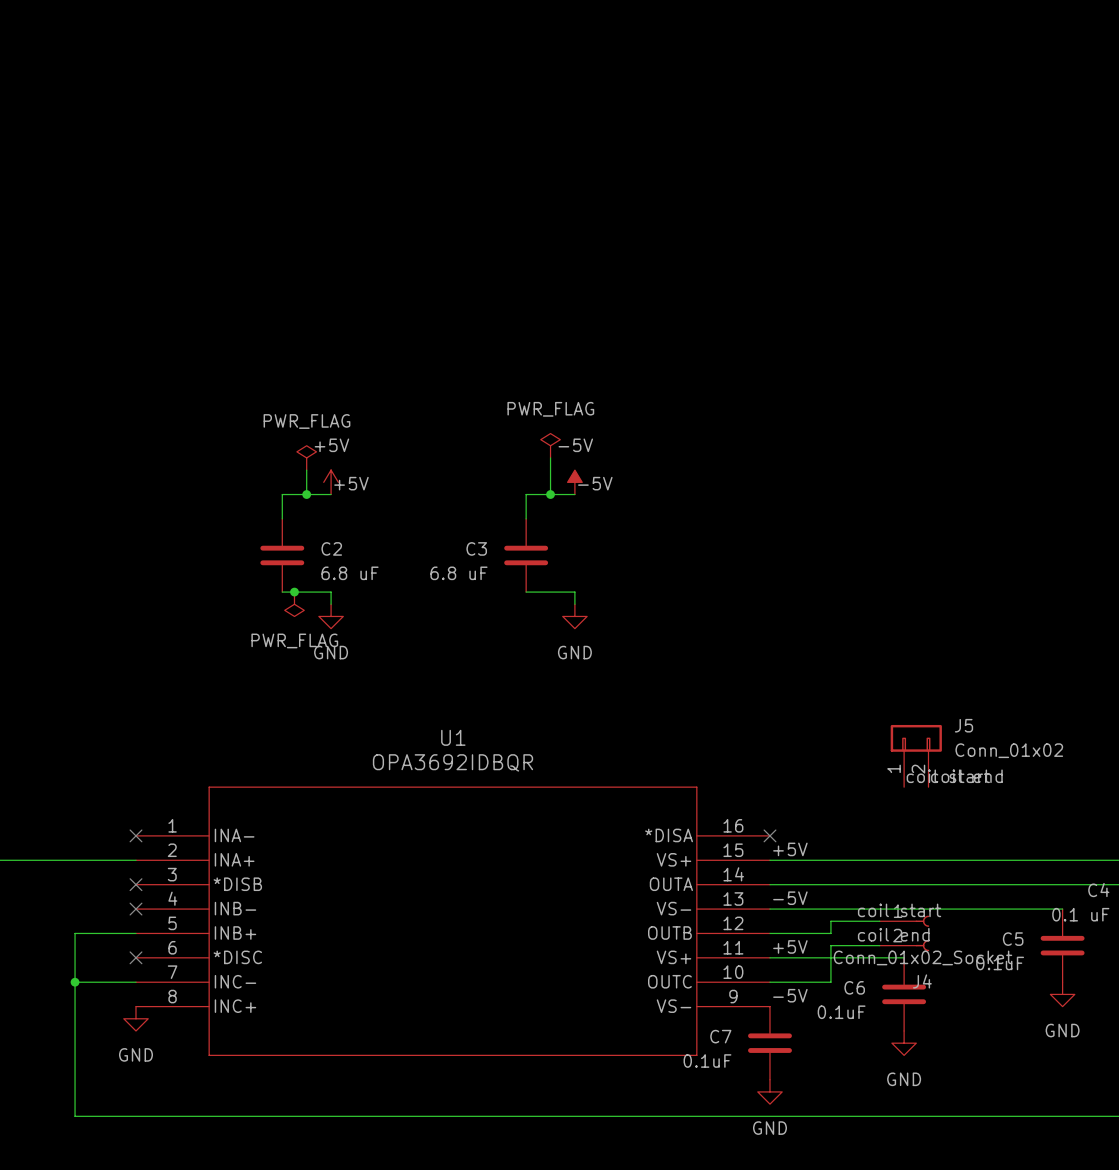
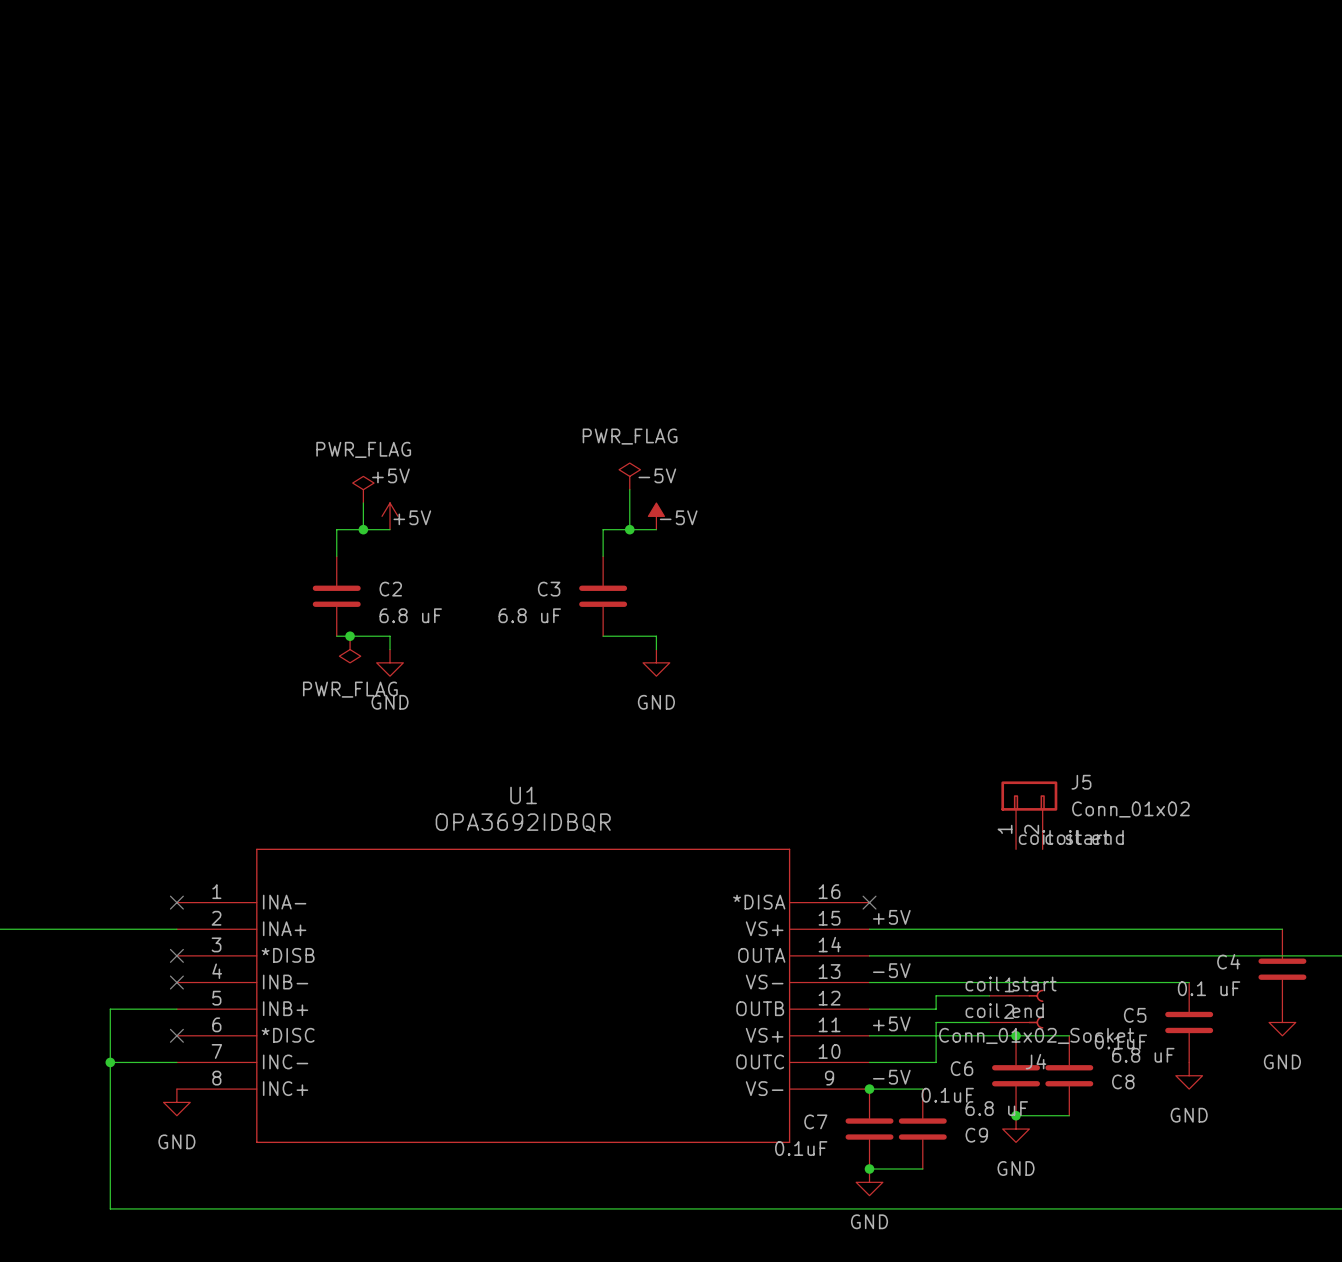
wire: none -> (1016, 1035) (1069, 1035)
junction: none -> (1016, 1035)
C8: none -> 6.8 uF (1069, 1075)
wire: none -> (869, 1089) (922, 1089)
junction: none -> (869, 1089)
wire: none -> (1016, 1115) (1069, 1115)
junction: none -> (1016, 1115)
C9: none -> 6.8 uF (922, 1129)
wire: none -> (869, 1169) (922, 1169)
junction: none -> (869, 1169)

